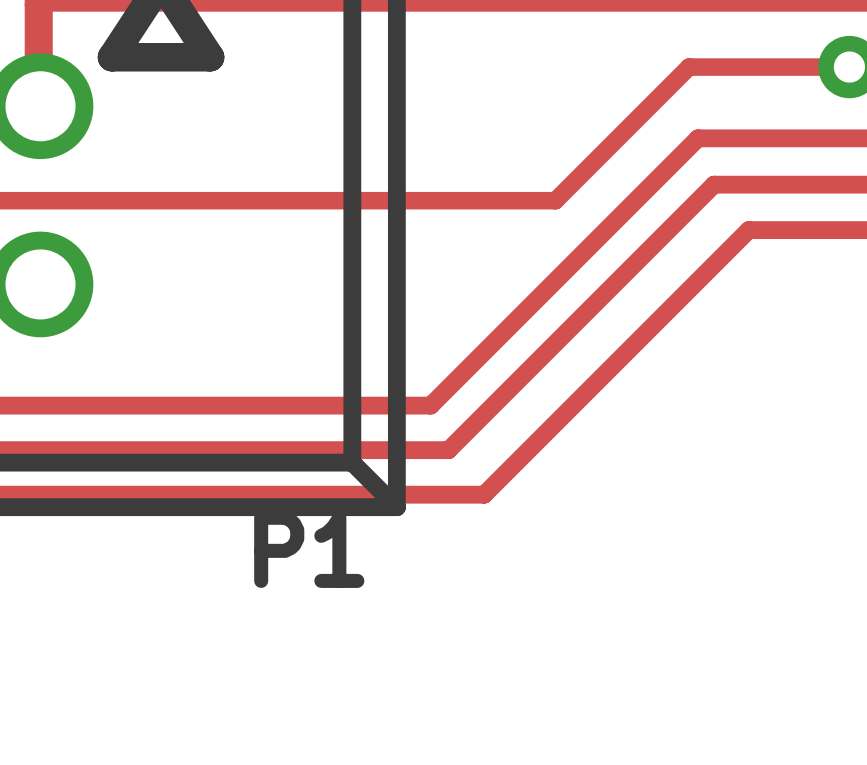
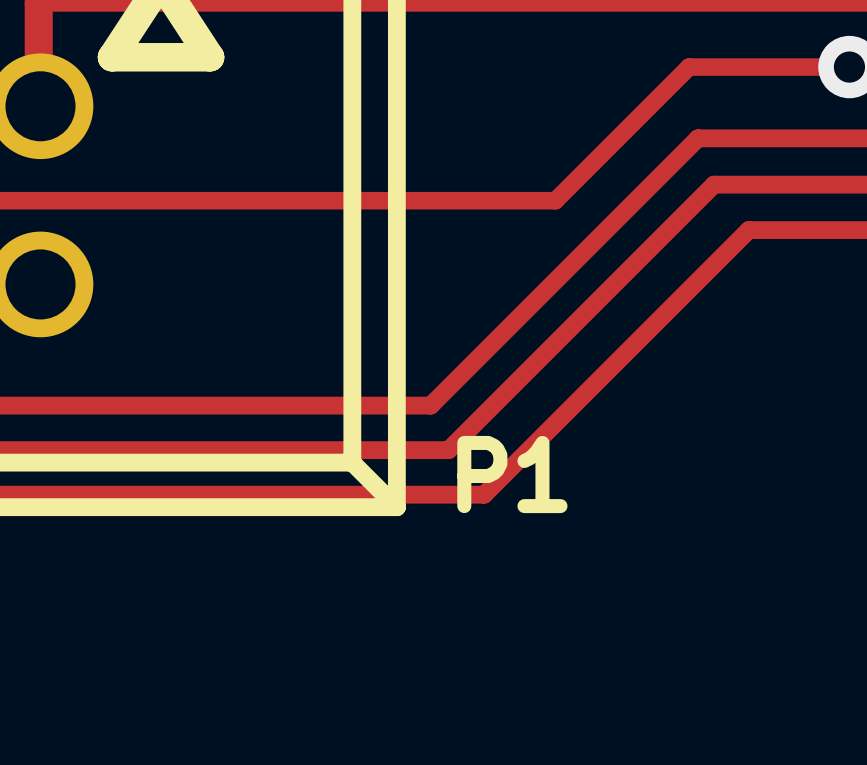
P1 name position: P1 (309, 549) -> P1 (512, 474)

